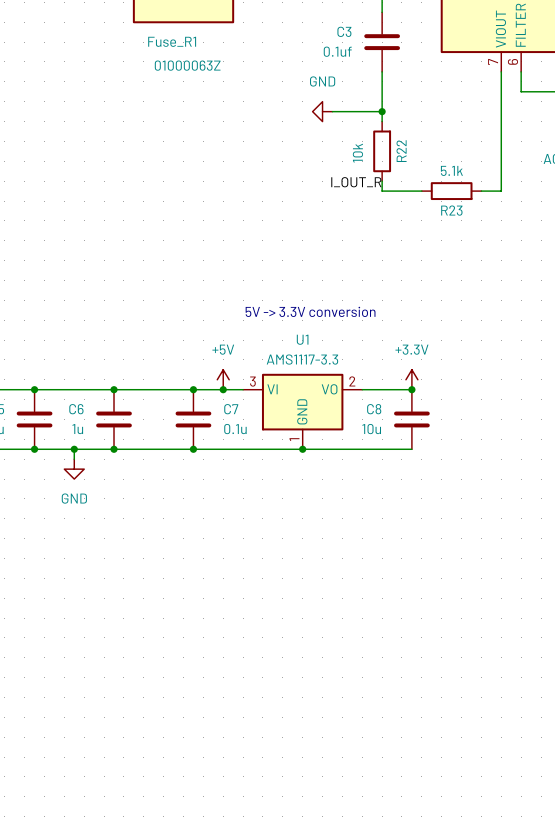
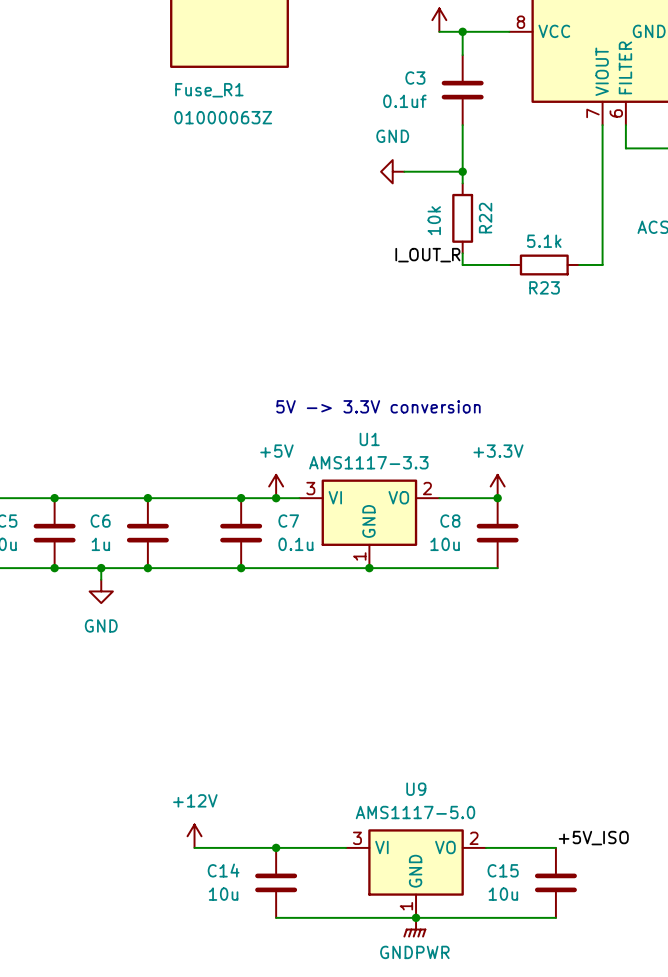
power symbol: none -> +12V (194, 836)
label: none -> +5V_ISO (593, 838)
wire: none -> (194, 847) (346, 847)
junction: none -> (276, 847)
wire: none -> (485, 847) (555, 847)
U9: none -> AMS1117-5.0 (416, 873)
C14: none -> 10u (276, 882)
C15: none -> 10u (555, 882)
wire: none -> (276, 917) (555, 917)
junction: none -> (416, 917)
power symbol: none -> GNDPWR (414, 927)

